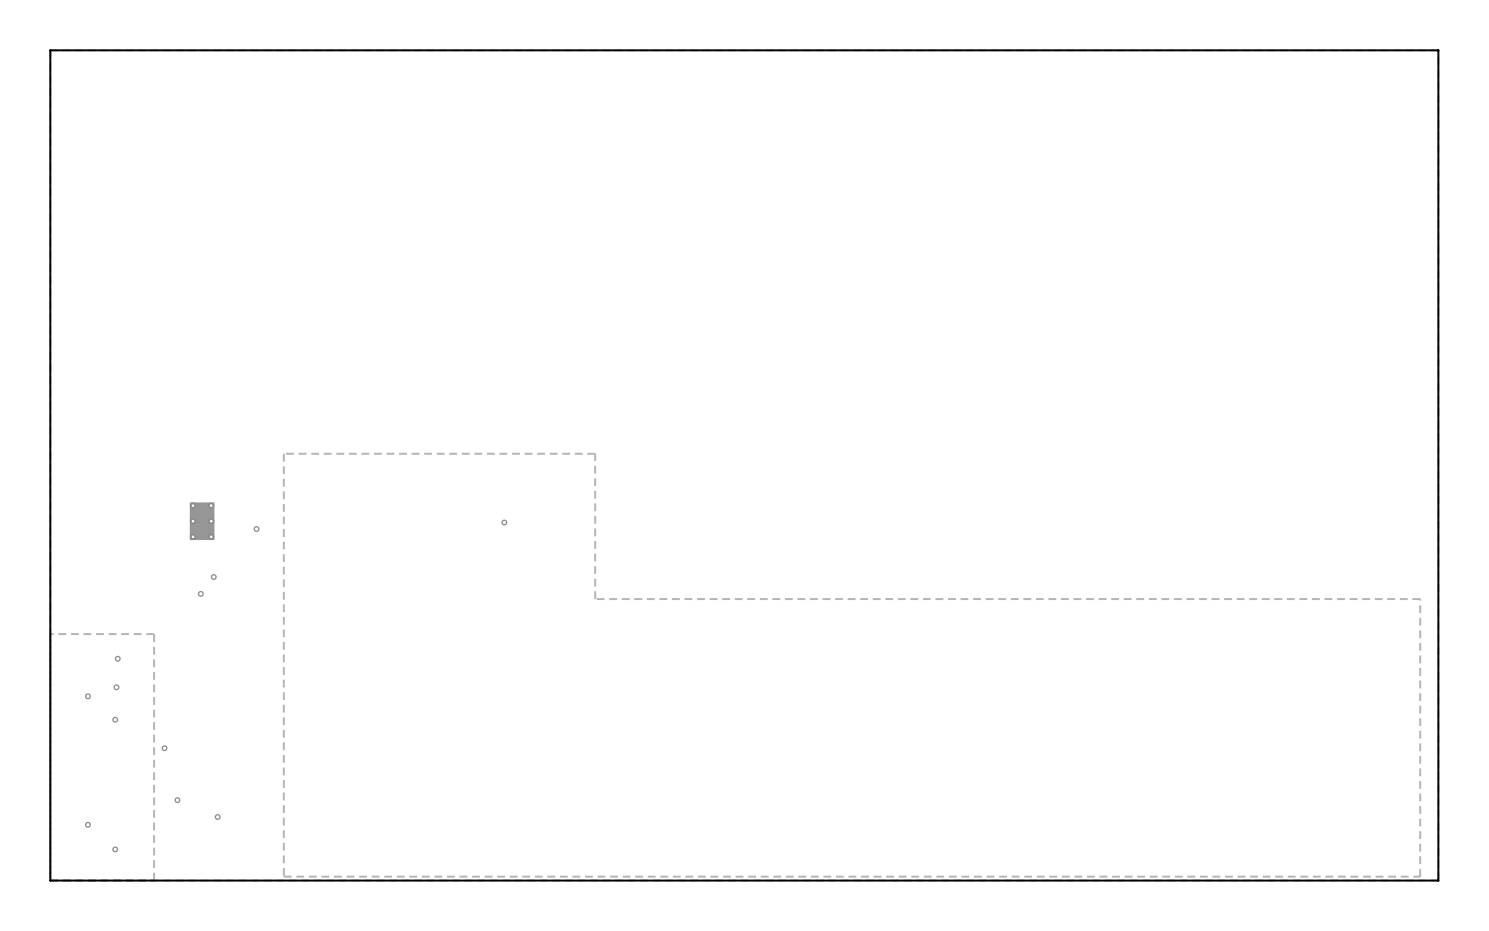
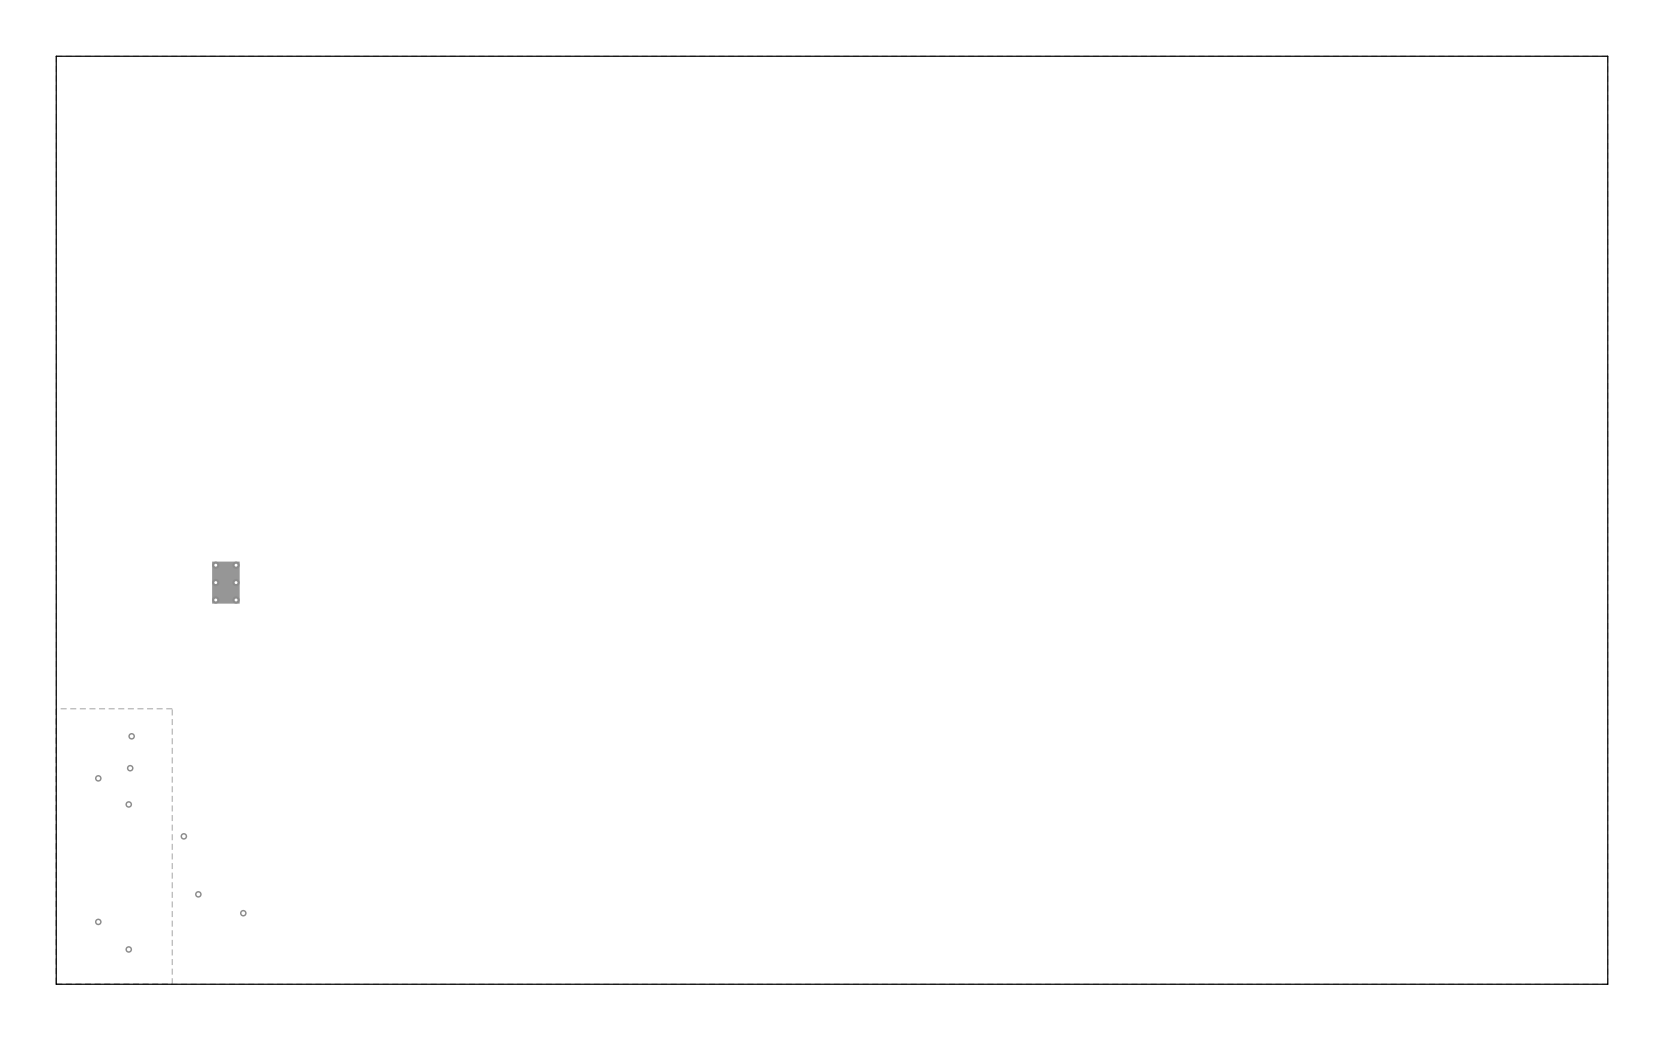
zone outline: (595, 453) (595, 599) (1420, 599) (1420, 876) (283, 876) (283, 453) (595, 453) -> none
via: (504, 522) -> none
via: (256, 529) -> none
via: (213, 577) -> none
via: (200, 593) -> none

